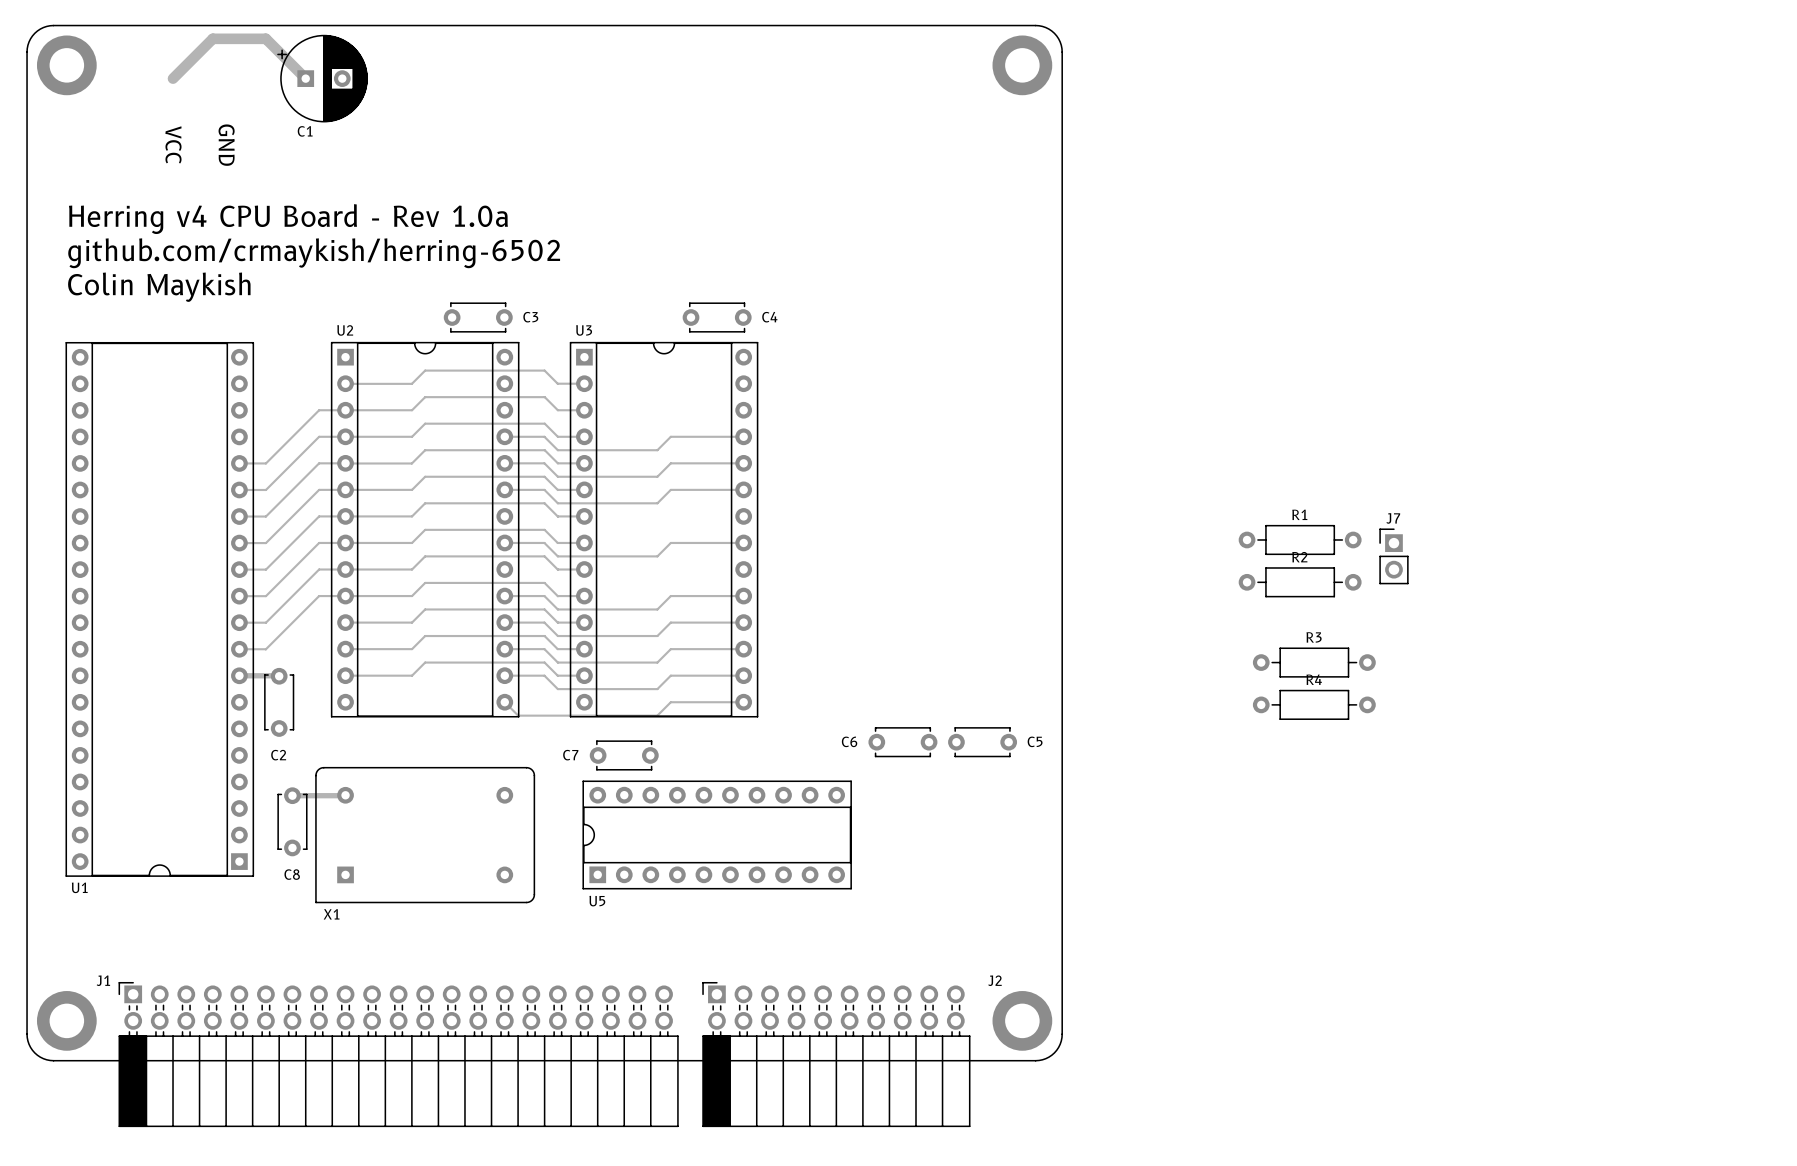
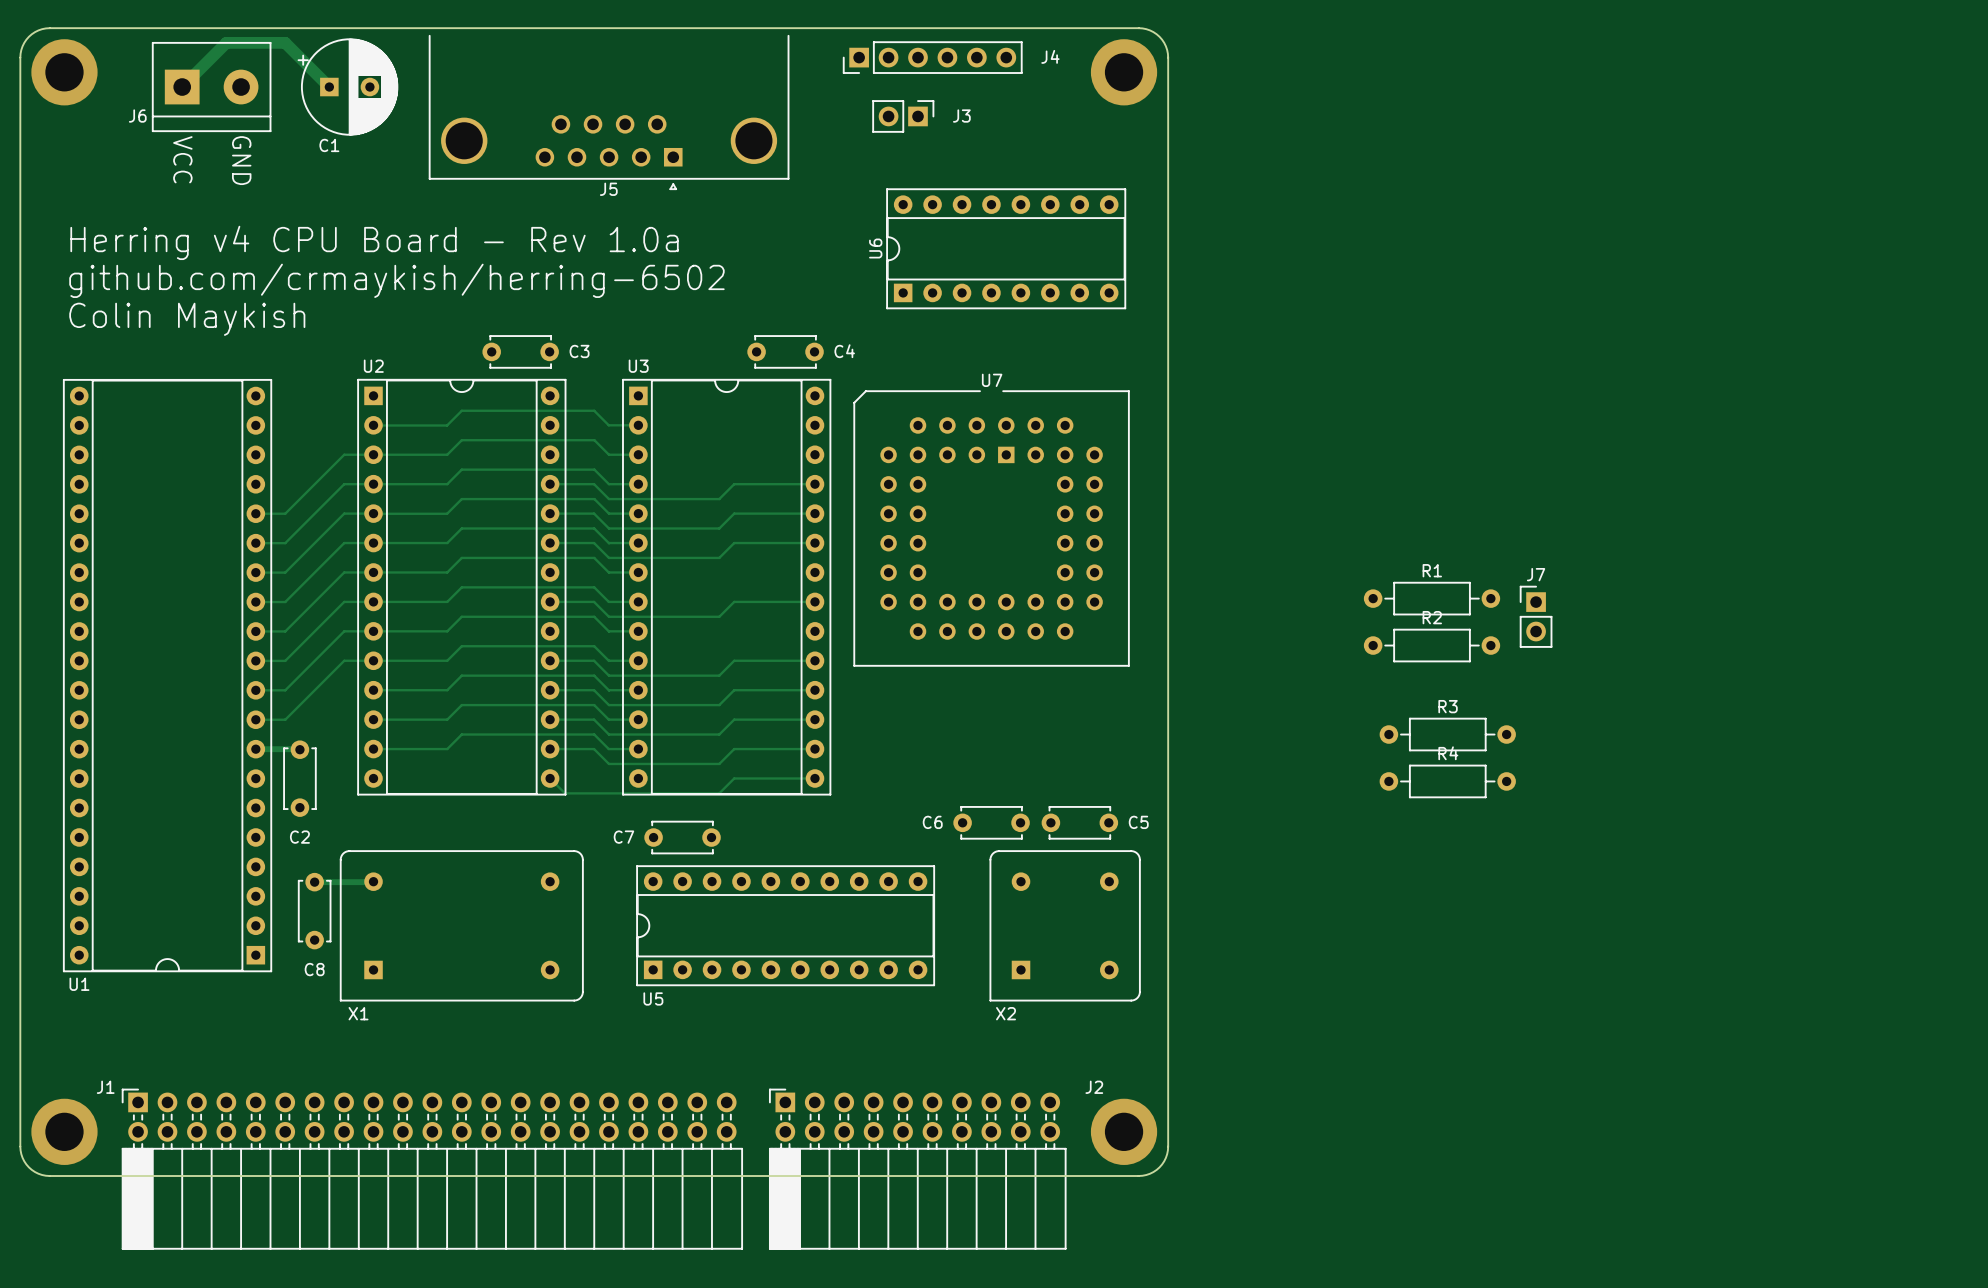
J4: none -> (932, 57)
J6: none -> (211, 87)
J5: none -> (609, 112)
J3: none -> (903, 116)
U6: none -> (1006, 248)
U7: none -> (991, 528)
X2: none -> (1065, 925)

